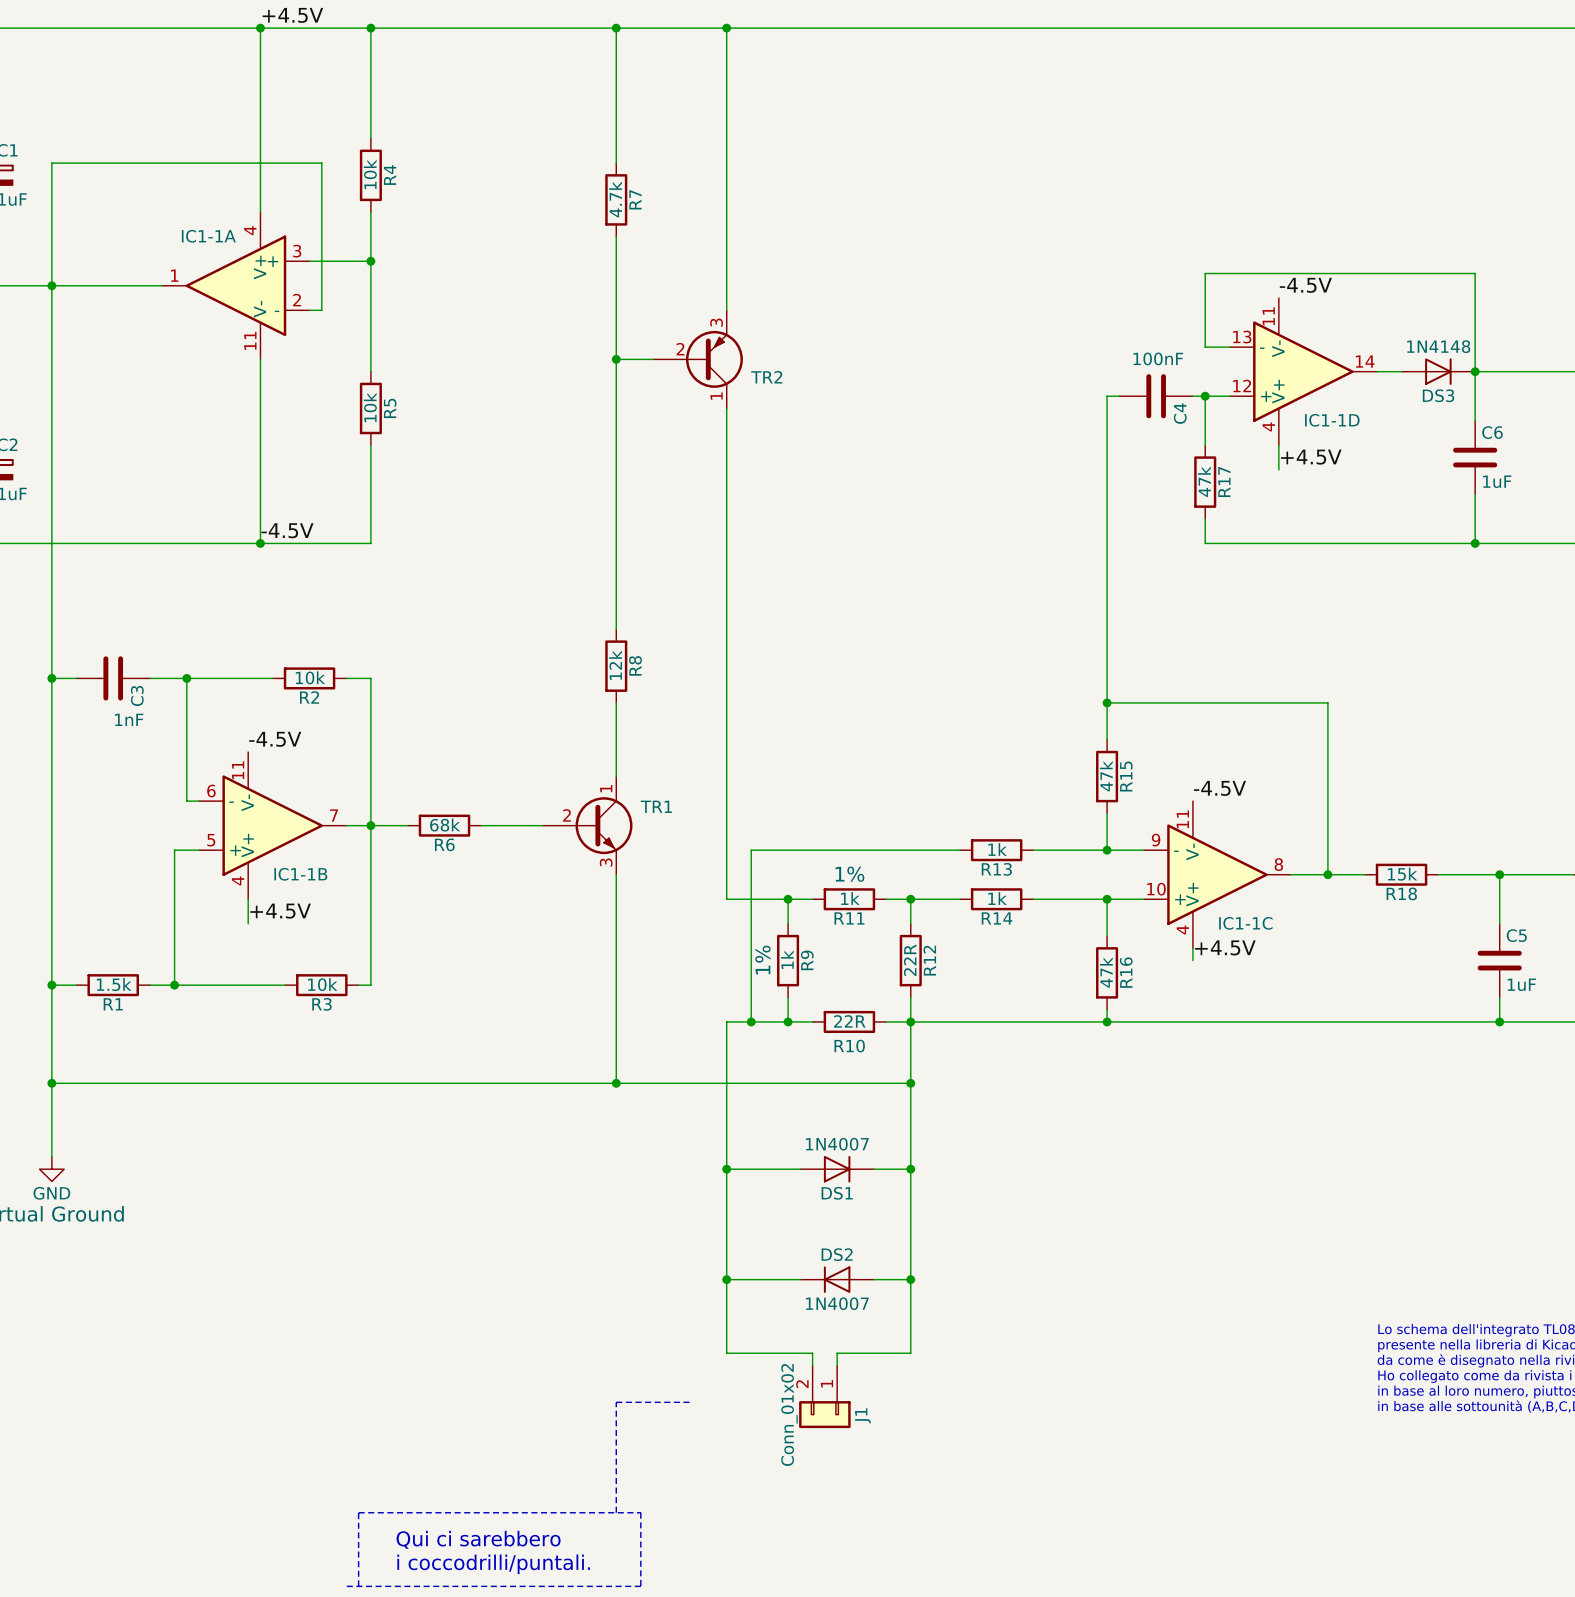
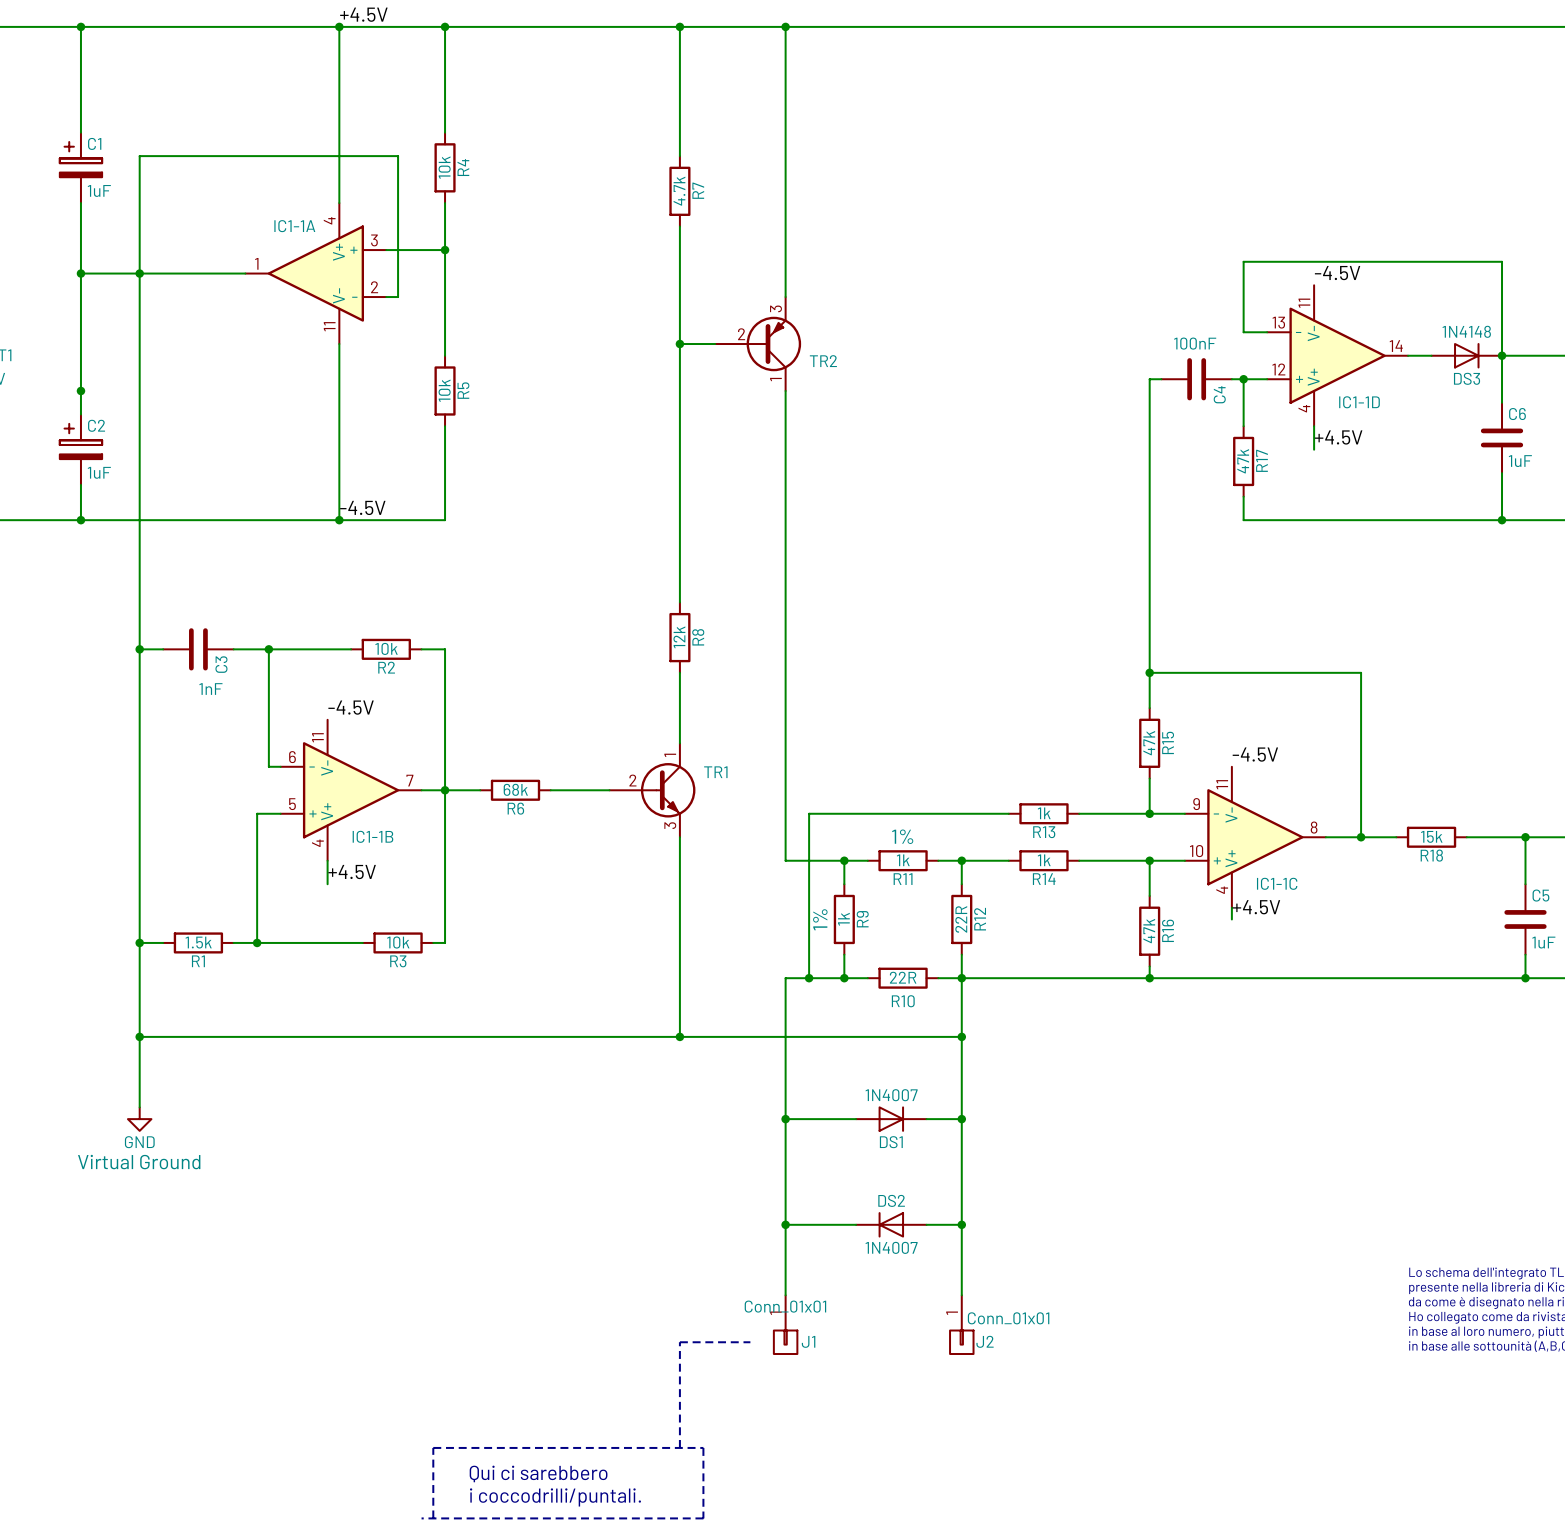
wire: (726, 1353) (812, 1353) (812, 1365) -> none
wire: (910, 1353) (837, 1353) (837, 1365) -> none
J1 symbol: [799, 1365, 851, 1429] -> [773, 1295, 798, 1355]
J2: none -> Conn_01x01 (961, 1324)
J1 value: Conn_01x02 (789, 1414) -> Conn_01x01 (785, 1306)

